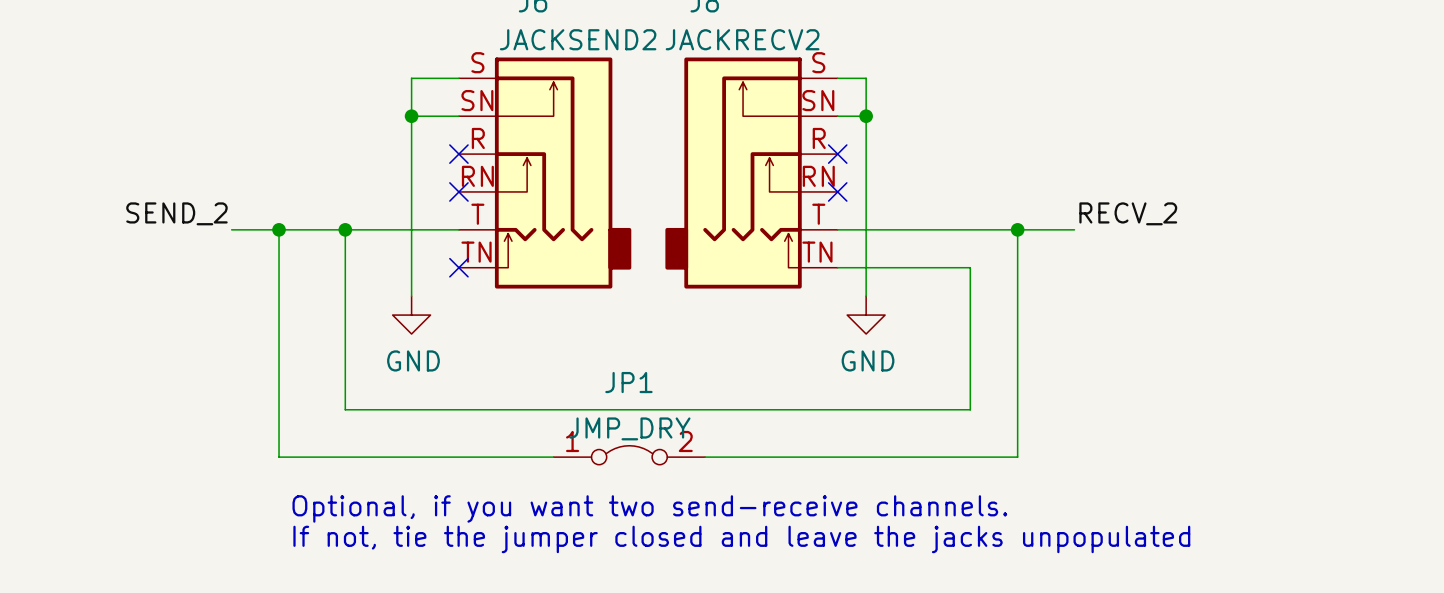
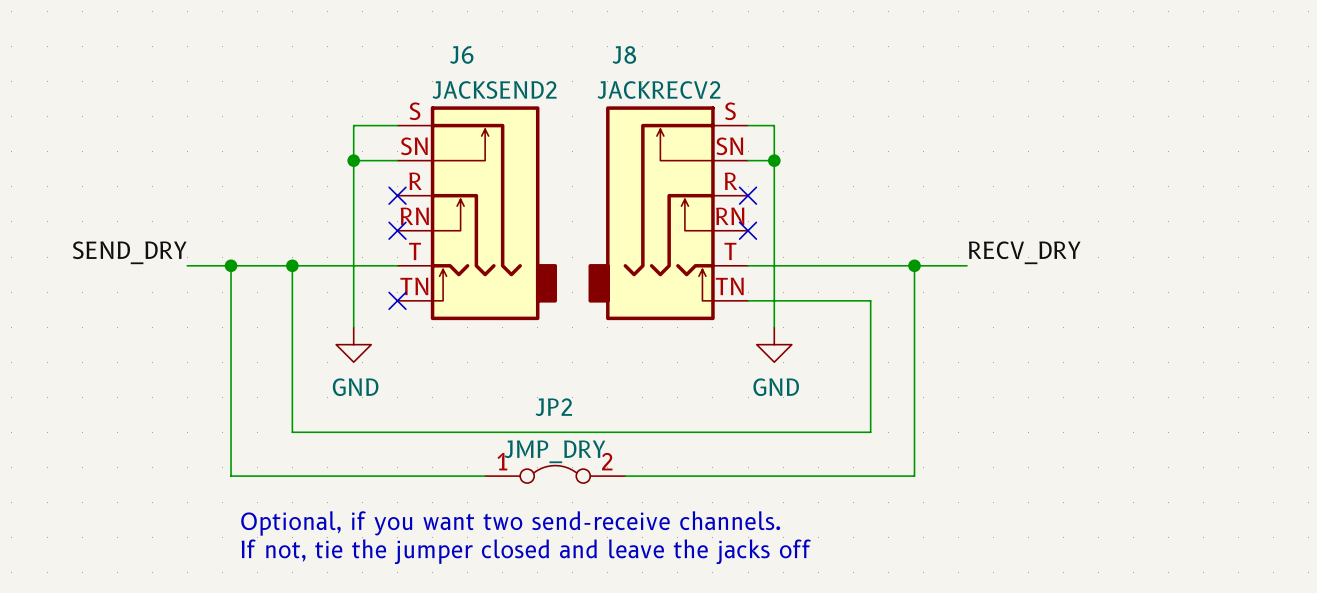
label: SEND_2 (176, 213) -> SEND_DRY (129, 252)
label: RECV_2 (1128, 213) -> RECV_DRY (1024, 252)
JP1 name: JP1 (628, 382) -> JP2 (553, 407)
text: If not, tie the jumper closed and leave the jacks unpopulated (741, 539) -> If not, tie the jumper closed and leave the jacks off (526, 551)

